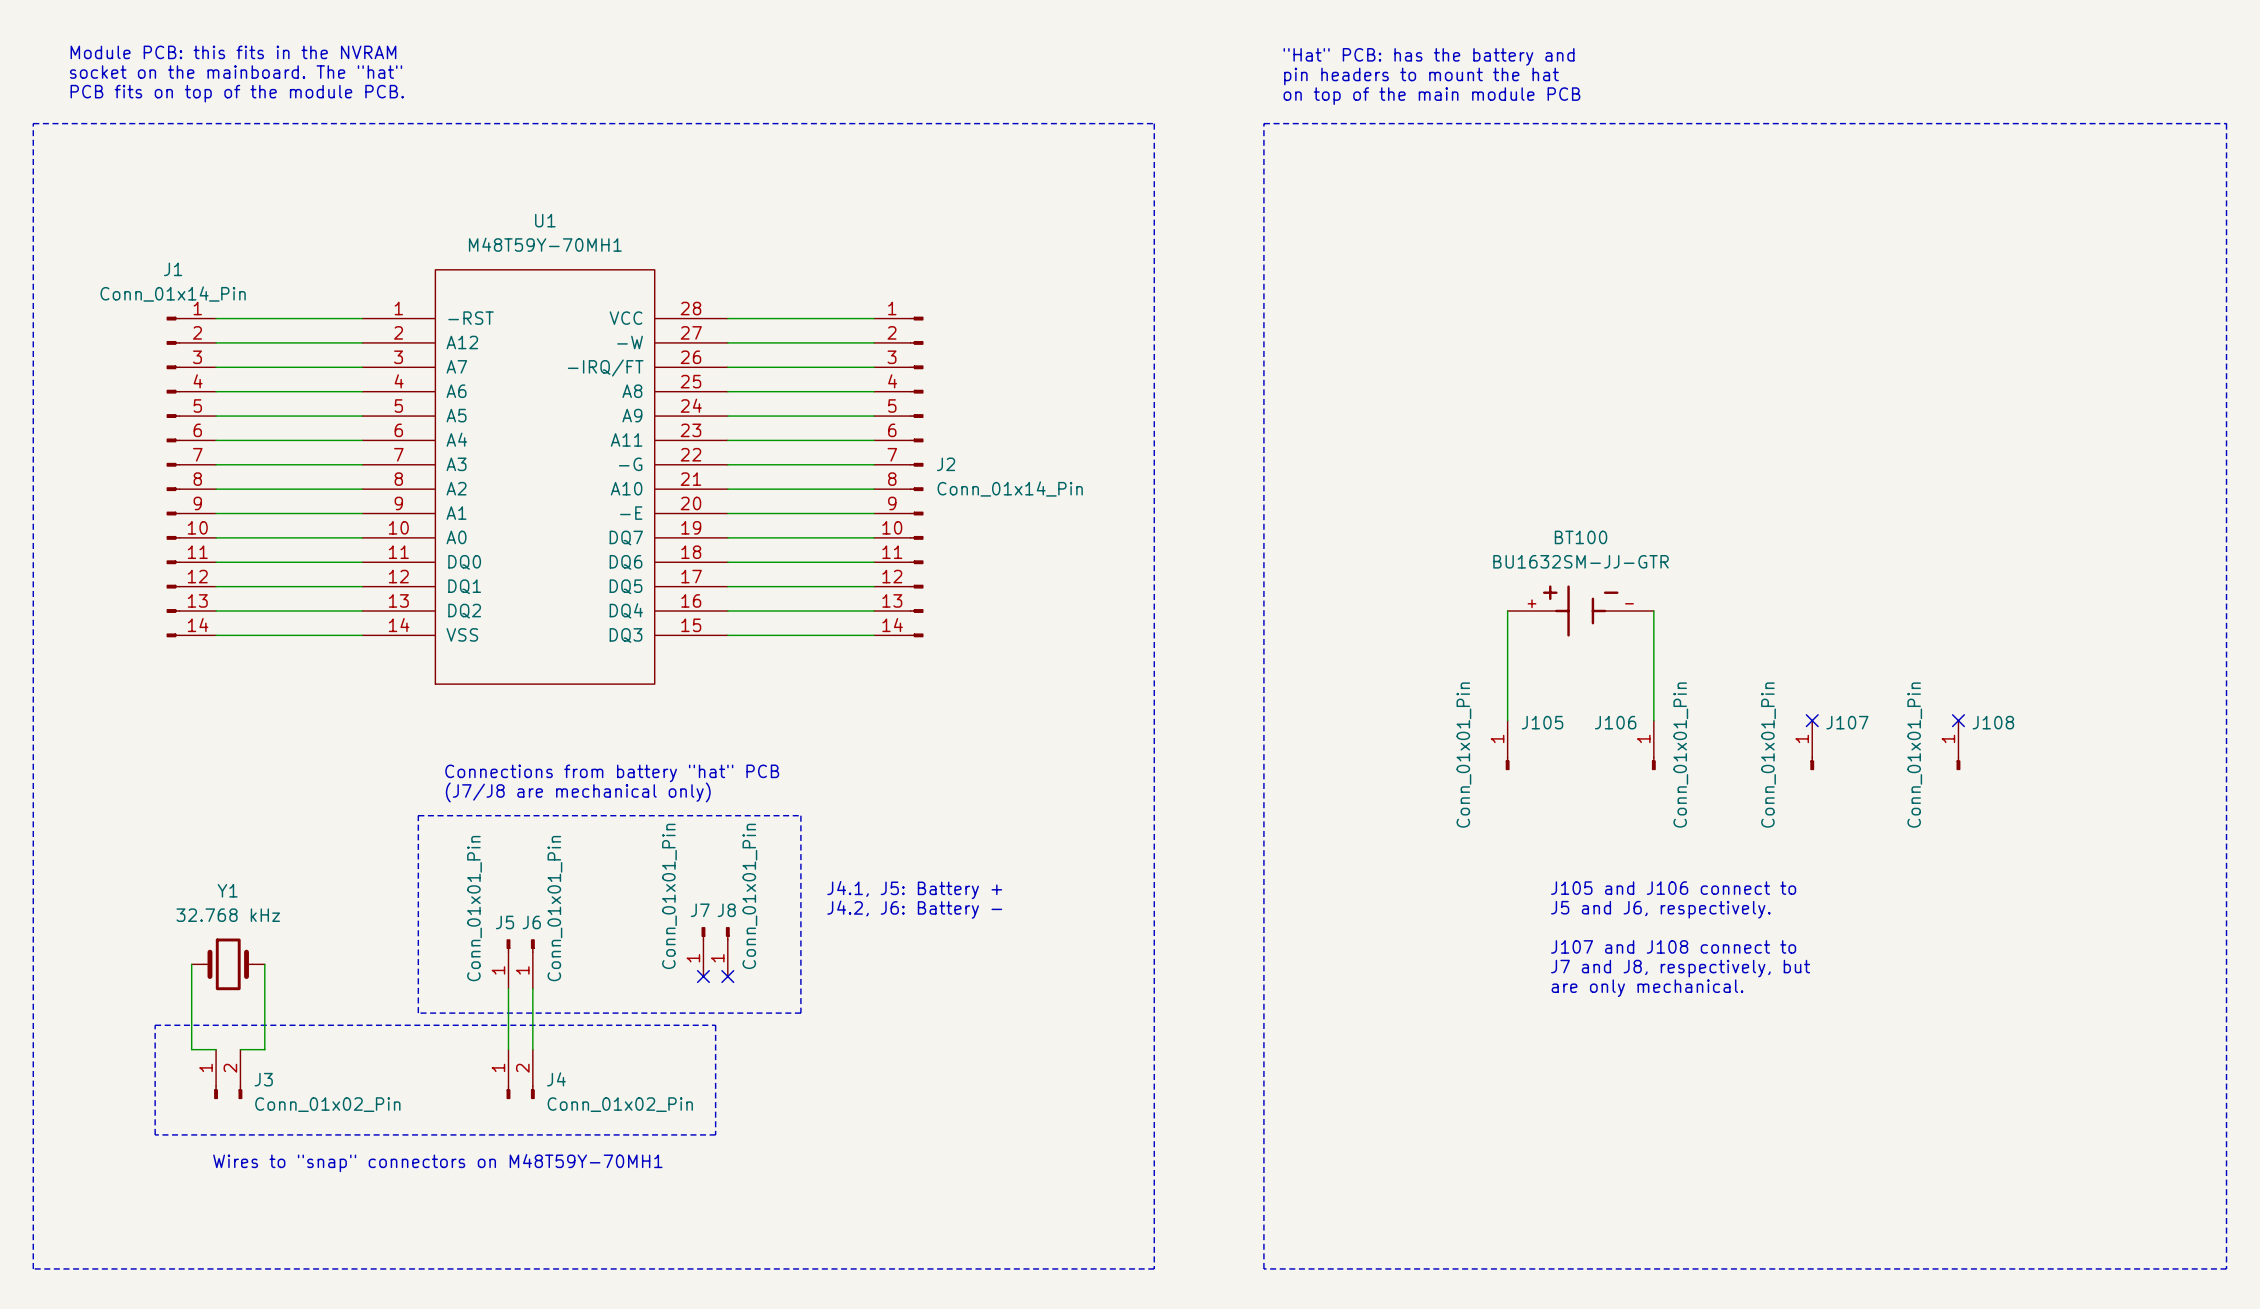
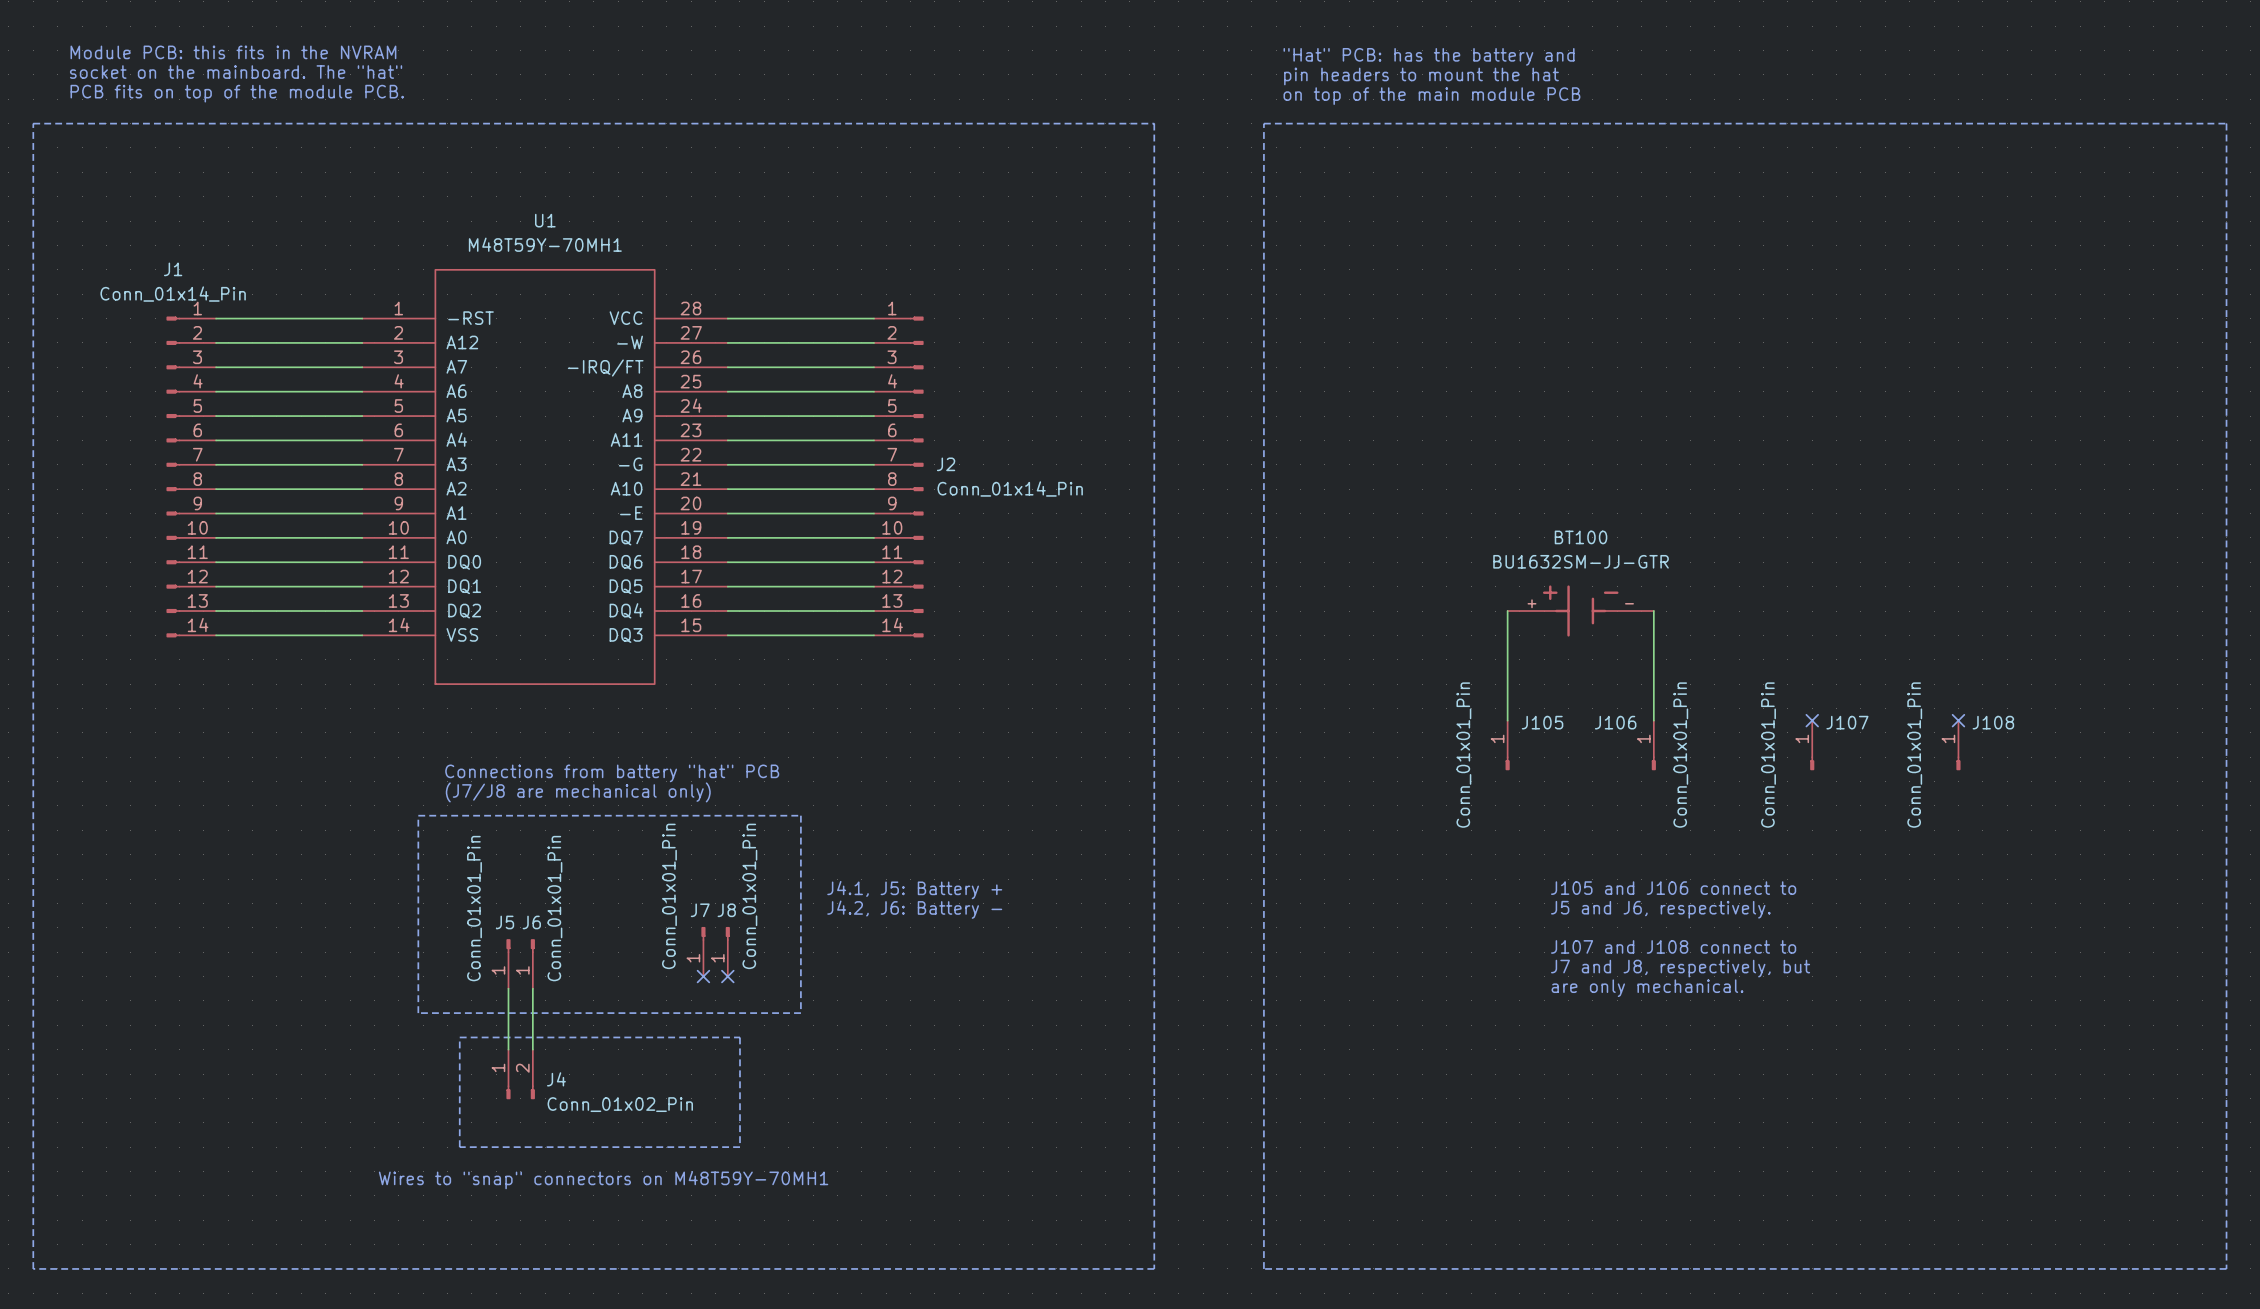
wire: (191, 964) (191, 1049) (216, 1049) -> none
Y1: 32.768 kHz (228, 964) -> none
wire: (264, 964) (264, 1049) (240, 1049) -> none
line: (155, 1025) (715, 1025) (715, 1134) (155, 1134) (155, 1025) -> none
line: none -> (459, 1037) (739, 1037) (739, 1147) (459, 1147) (459, 1037)
J3: Conn_01x02_Pin (228, 1074) -> none
text position: Wires to "snap" connectors on M48T59Y-70MH1 (437, 1163) -> Wires to "snap" connectors on M48T59Y-70MH1 (603, 1180)

